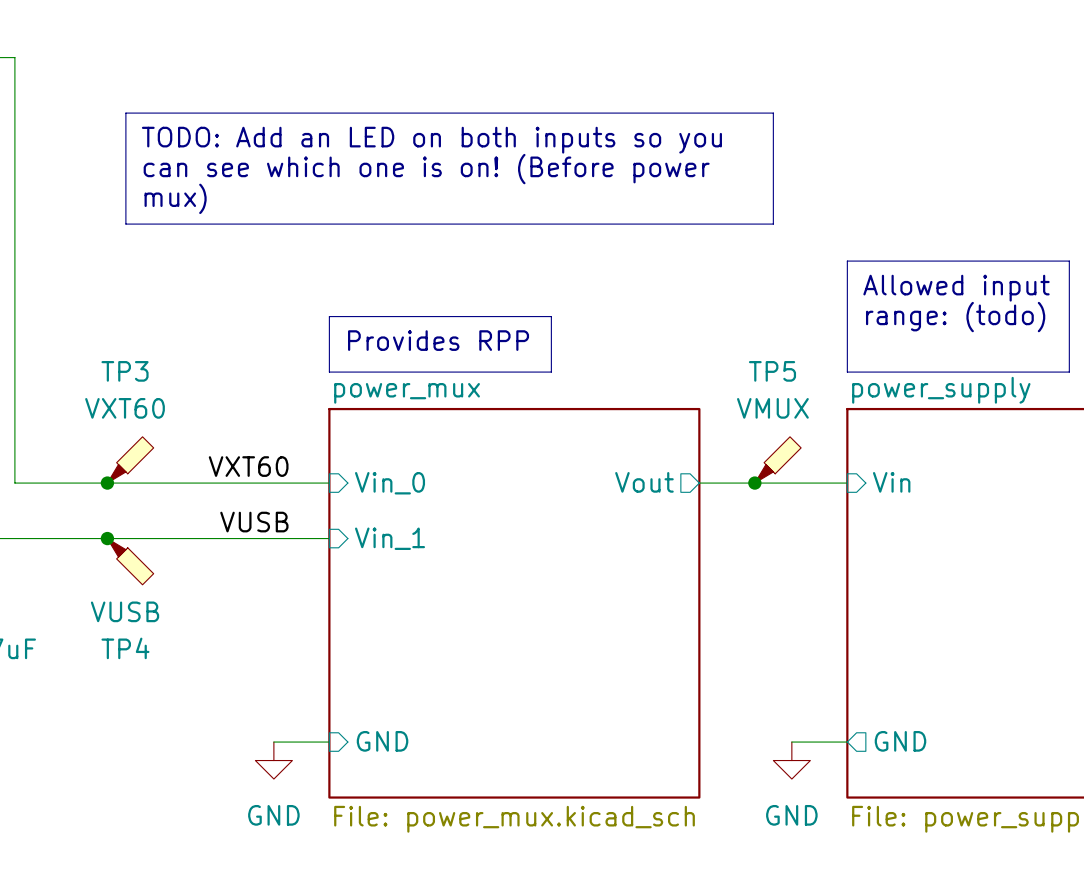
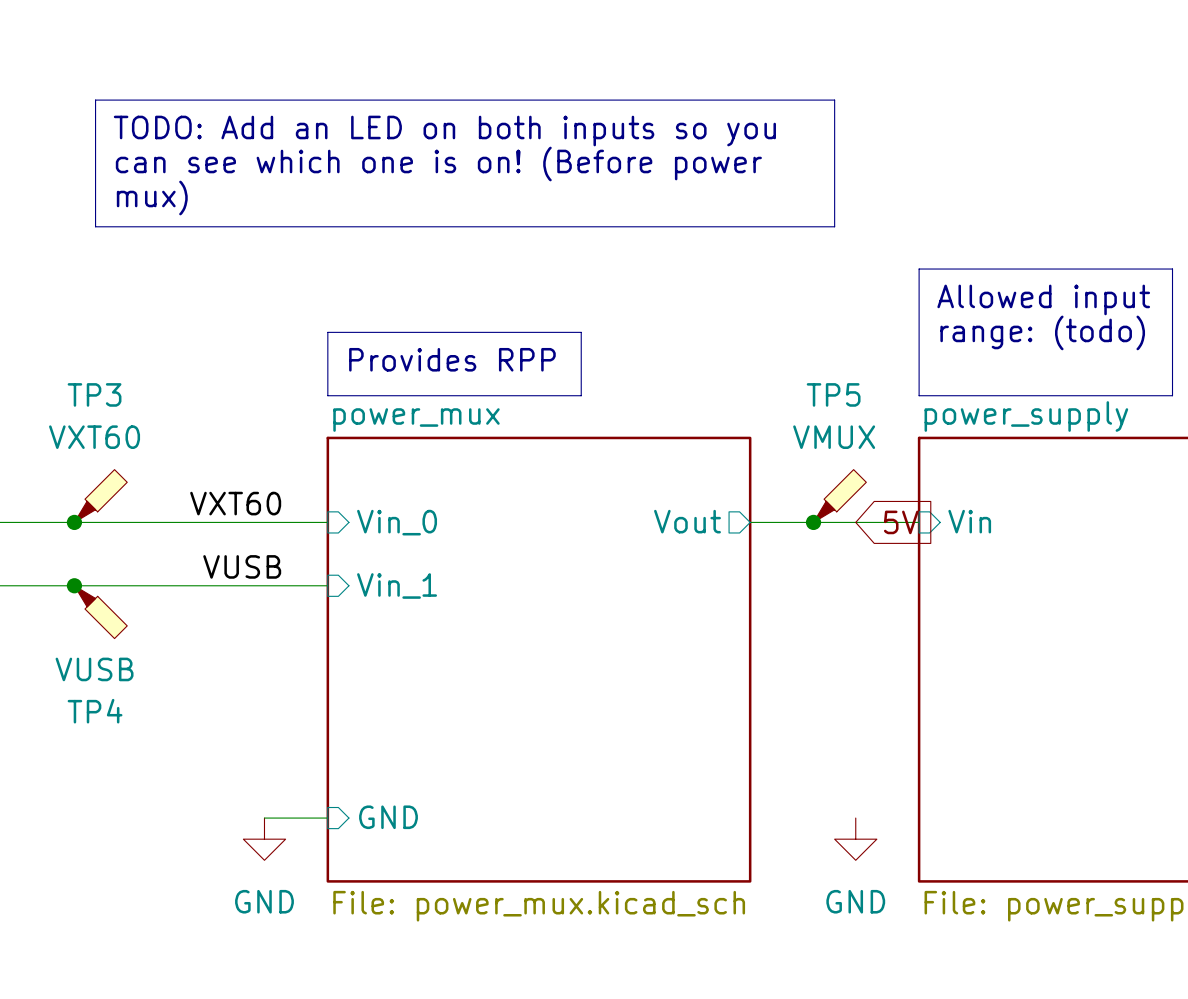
global label: none -> 5V (901, 522)
sheet pin: GND (900, 741) -> none
wire: (791, 742) (847, 742) -> none

